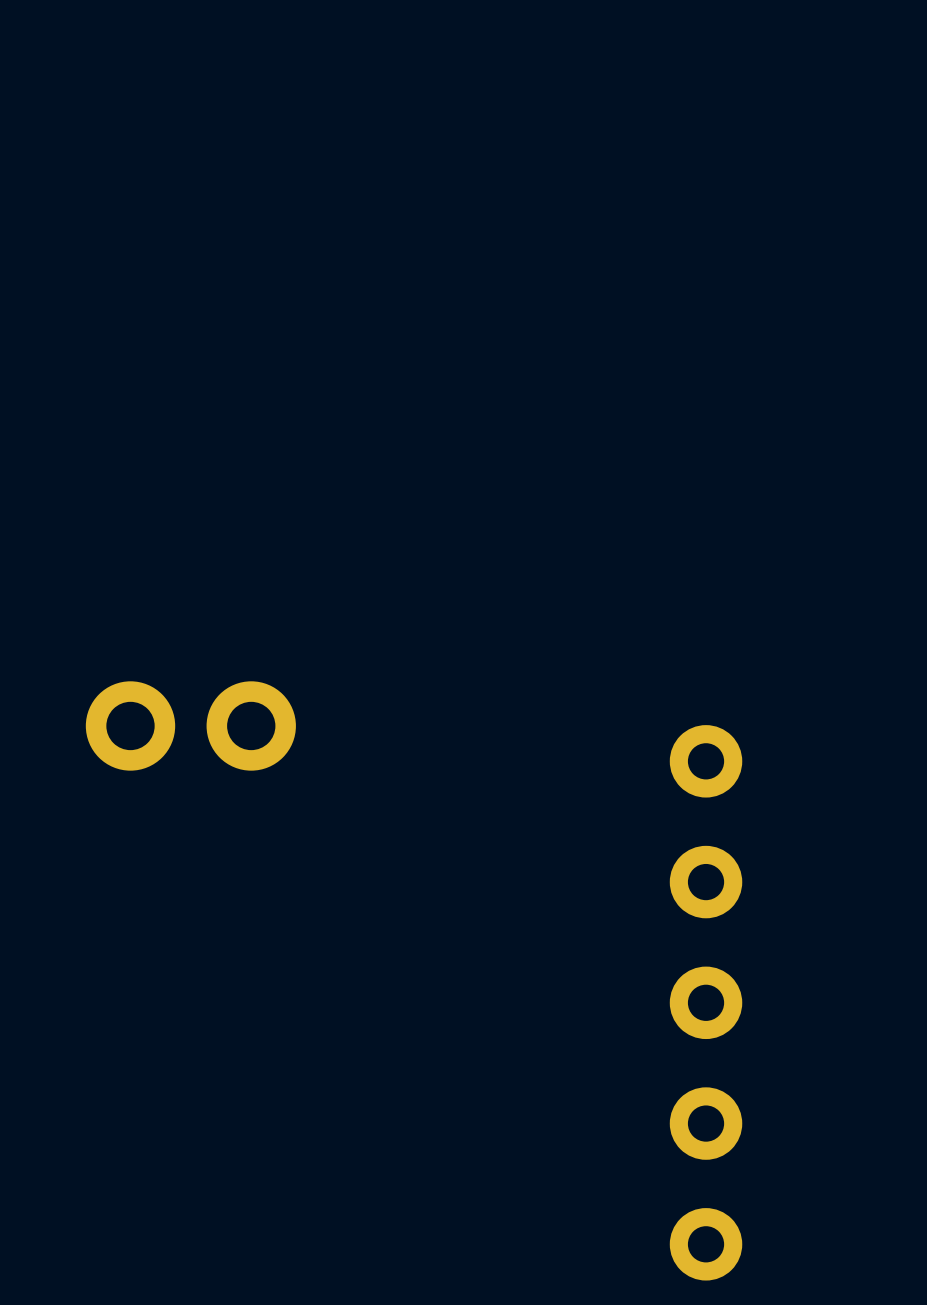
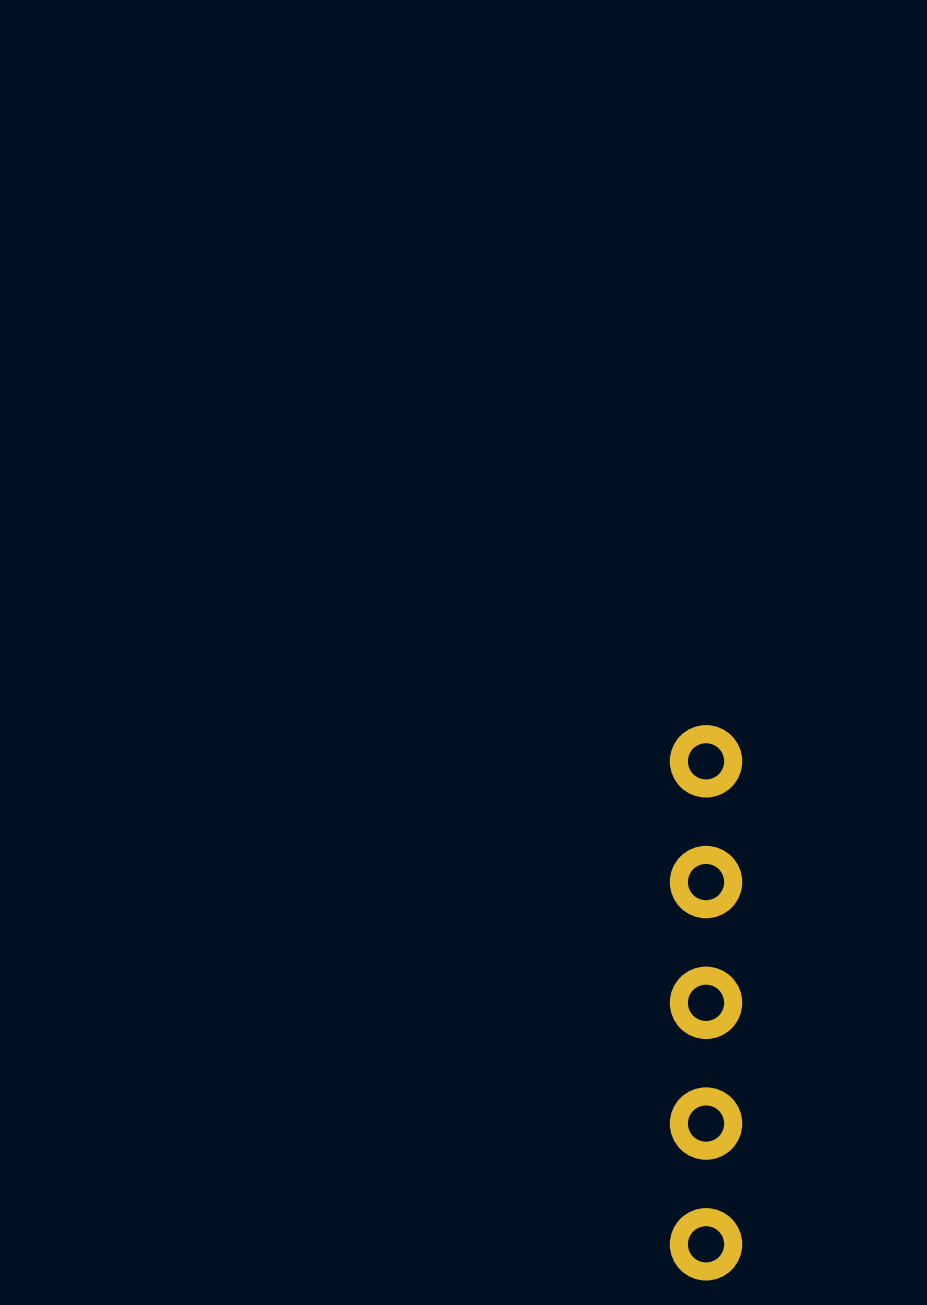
part: (190, 725) -> none

